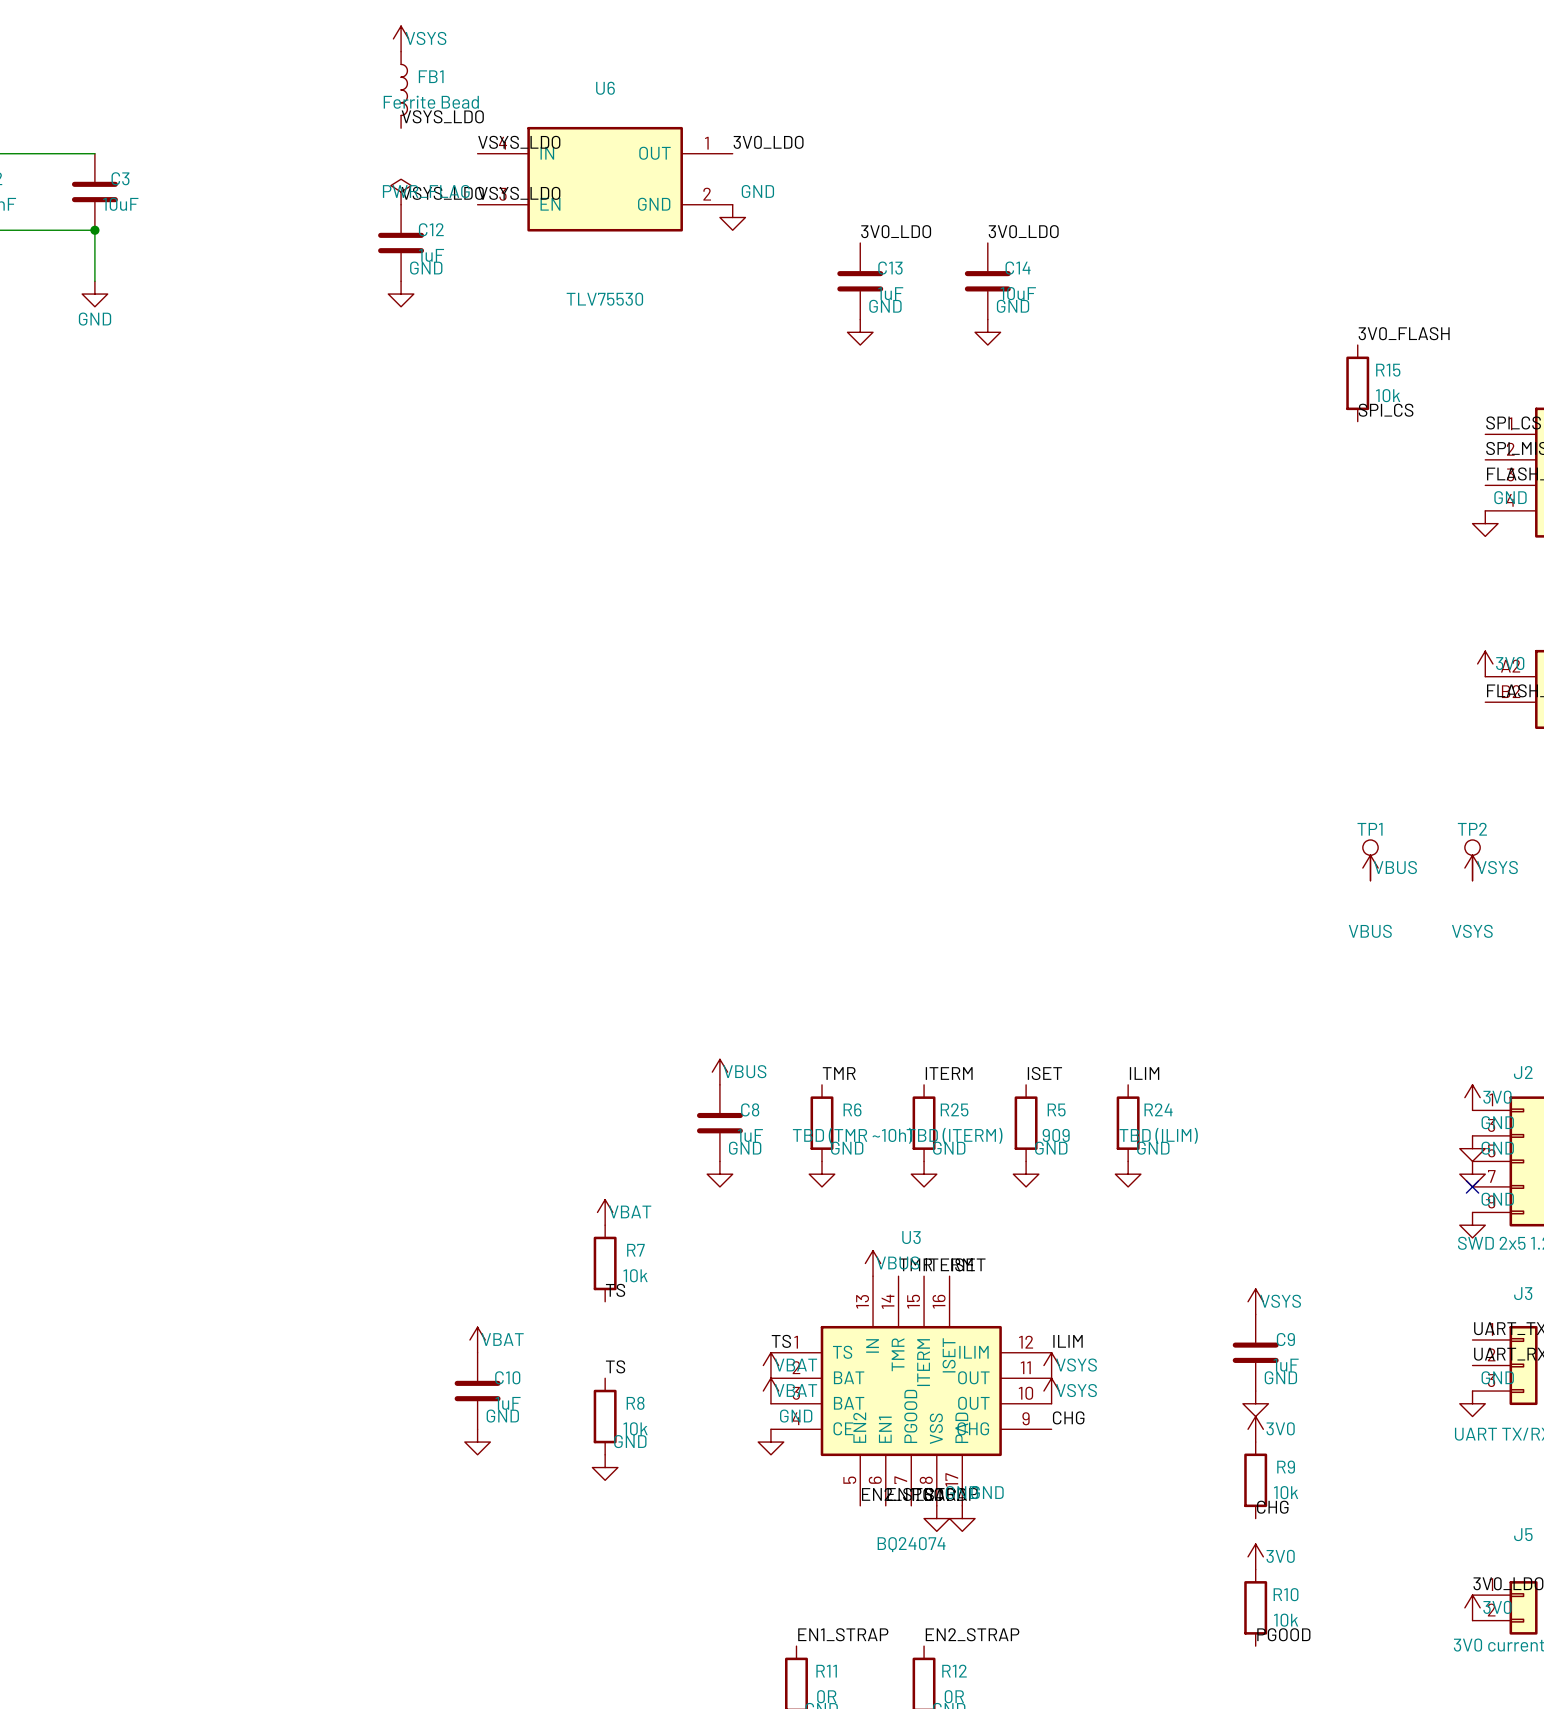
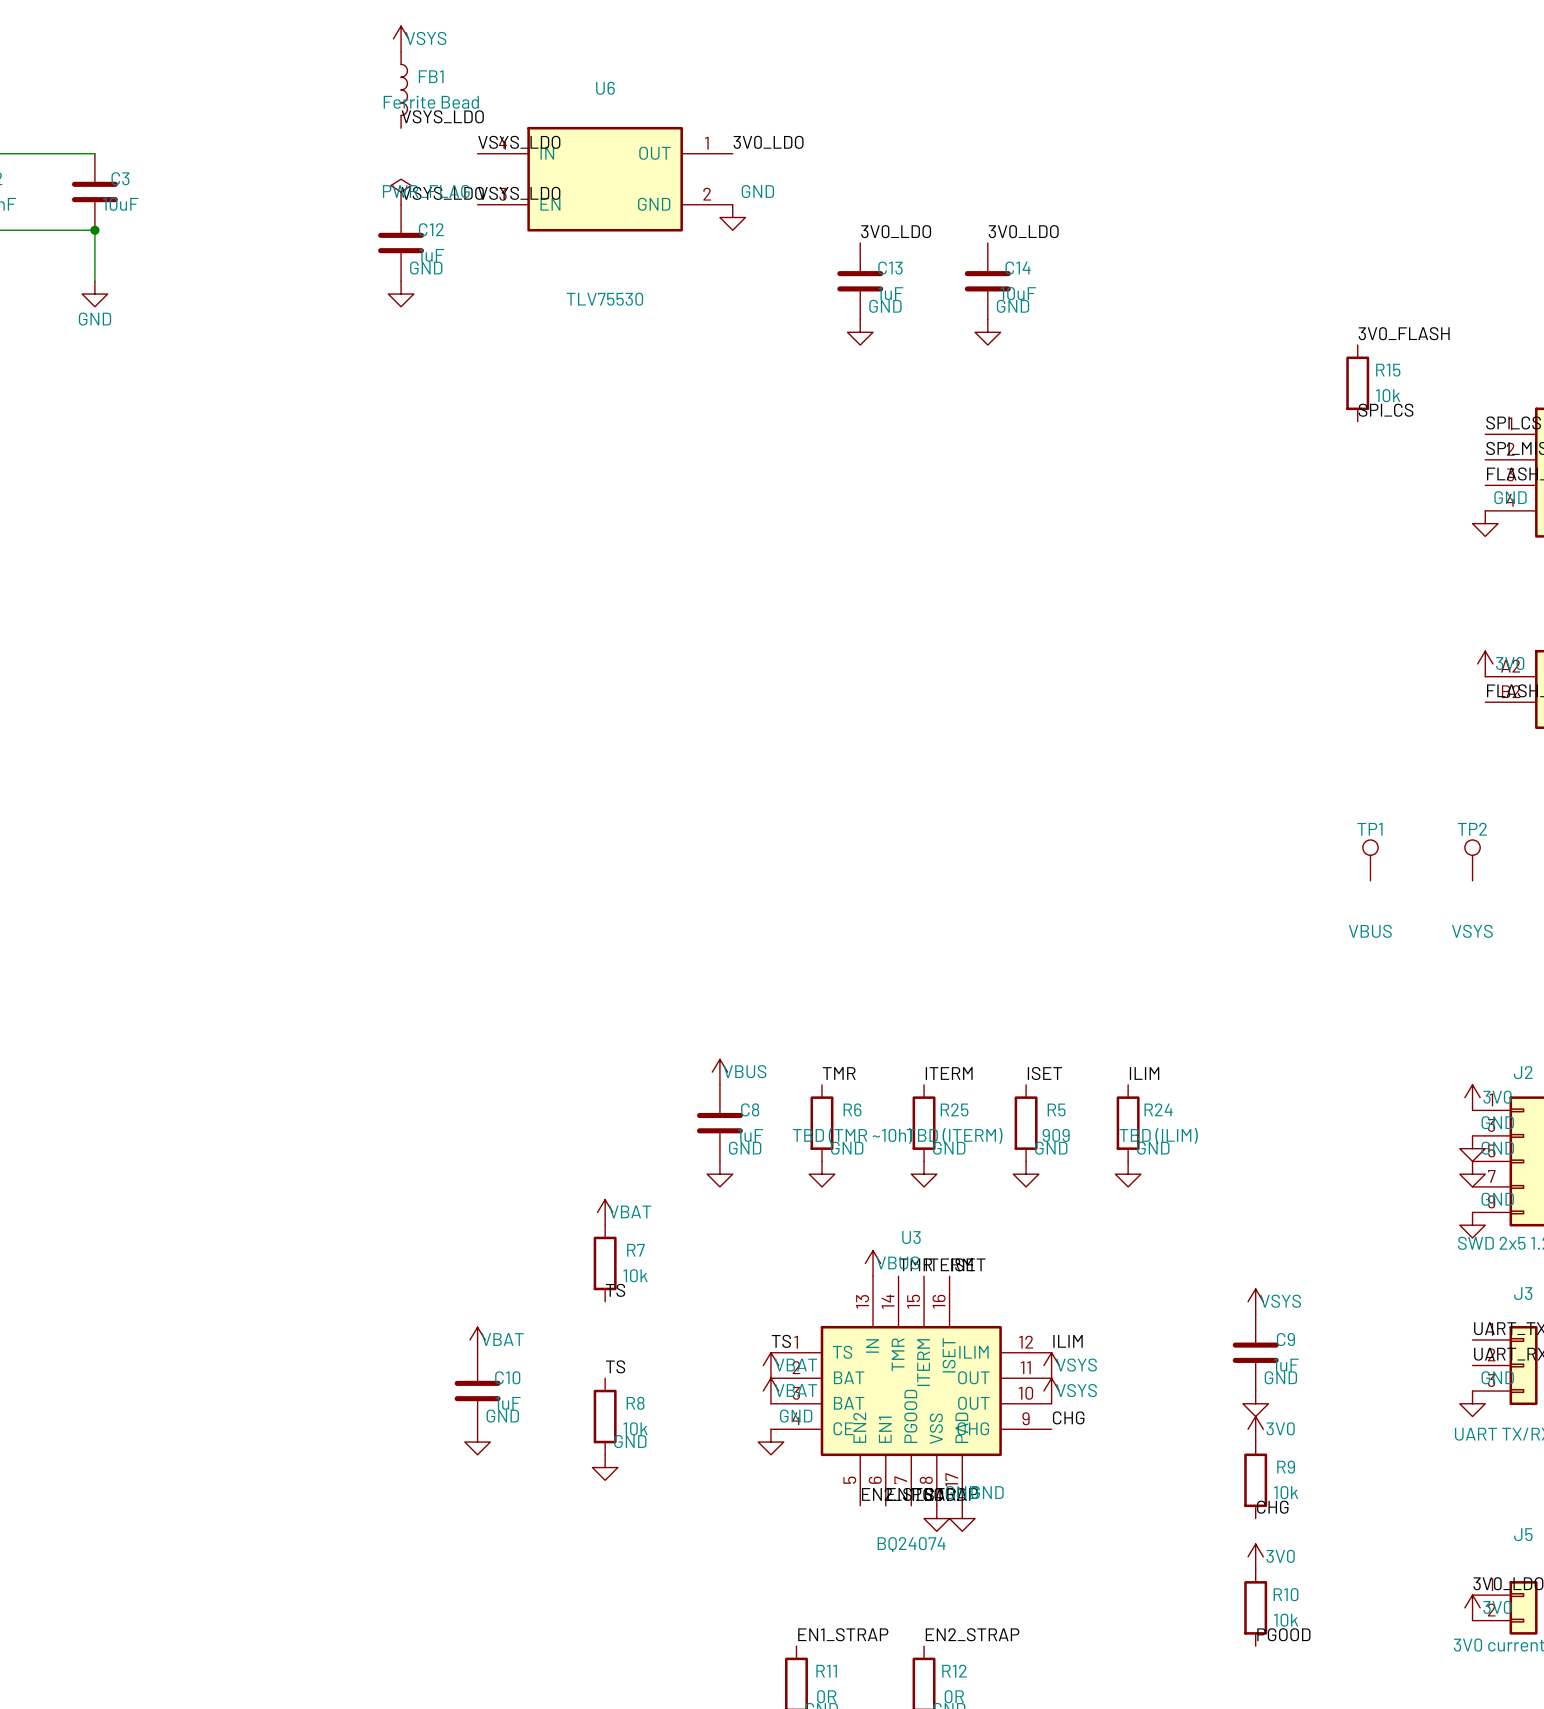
power symbol: VBUS (1370, 868) -> none
power symbol: VSYS (1472, 868) -> none
no-connect mark: (1472, 1186) -> none

